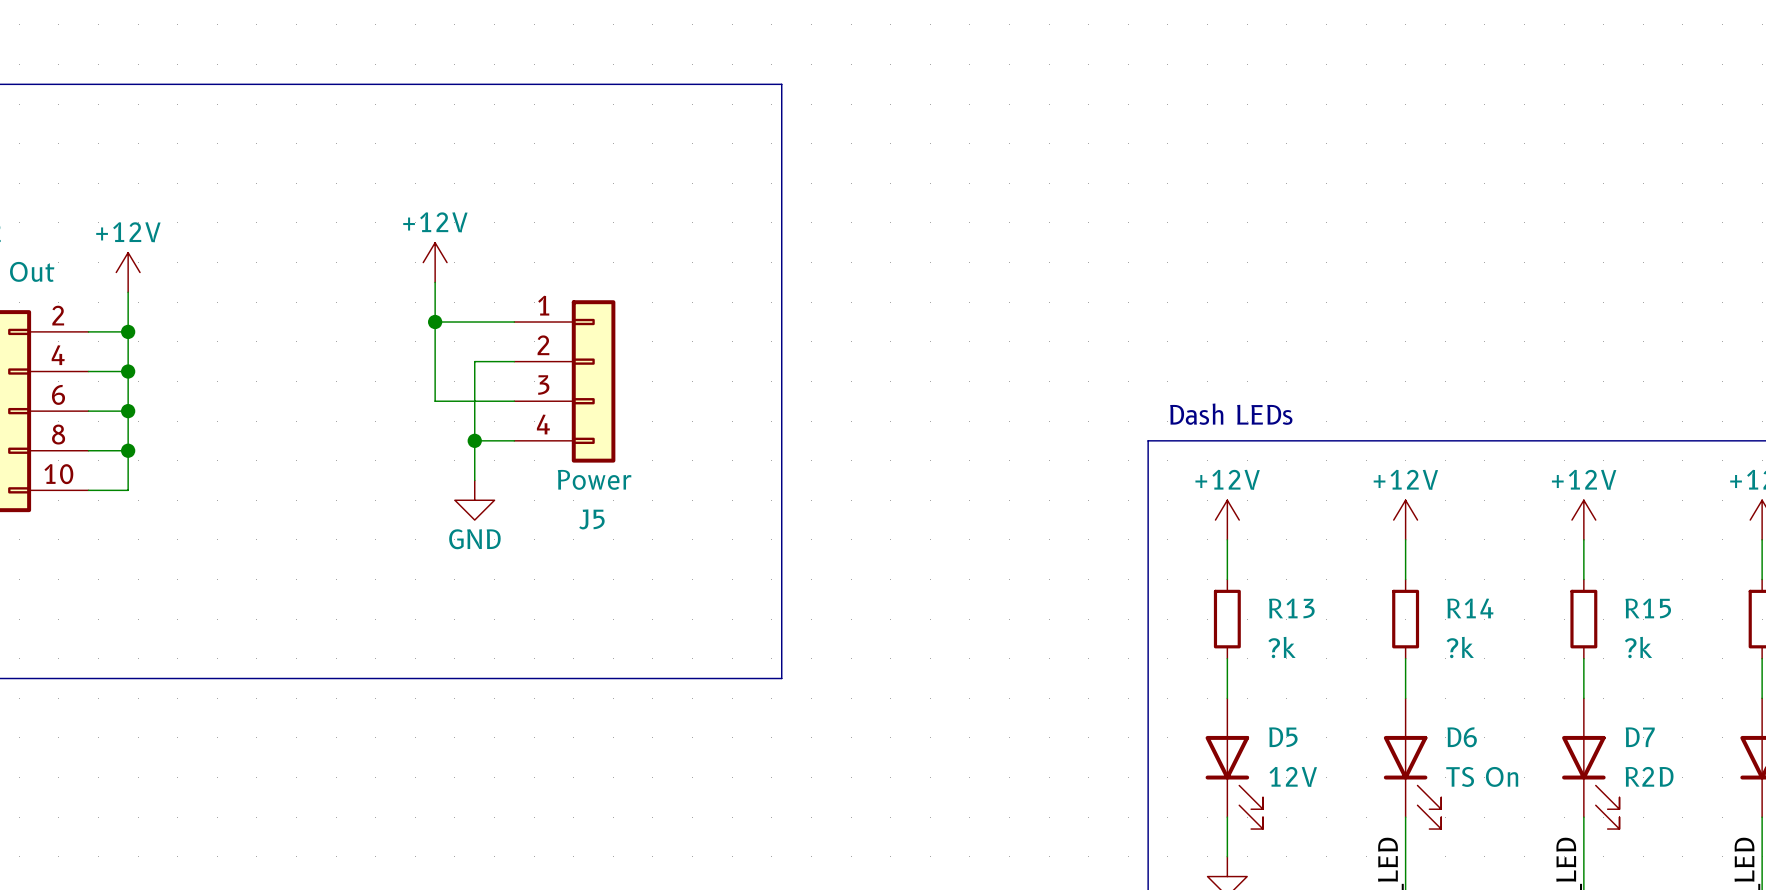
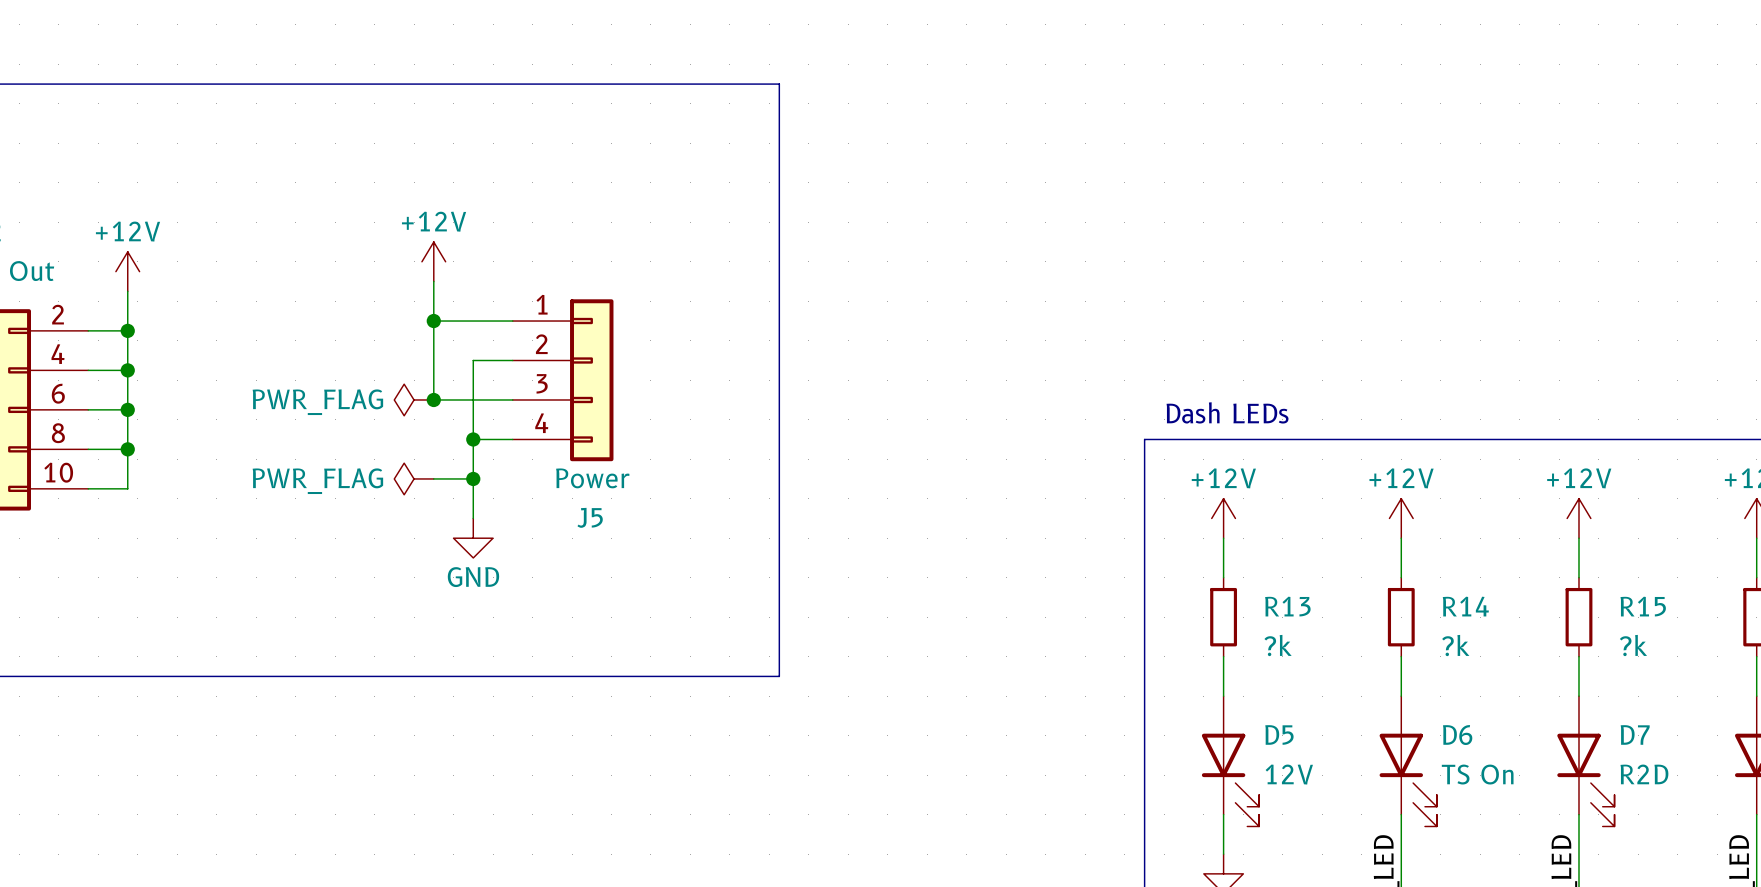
power symbol: none -> PWR_FLAG (414, 399)
junction: none -> (433, 399)
power symbol: none -> PWR_FLAG (414, 478)
wire: none -> (433, 478) (473, 478) (473, 518)
junction: none -> (473, 478)
power symbol position: GND (474, 500) -> GND (473, 538)

